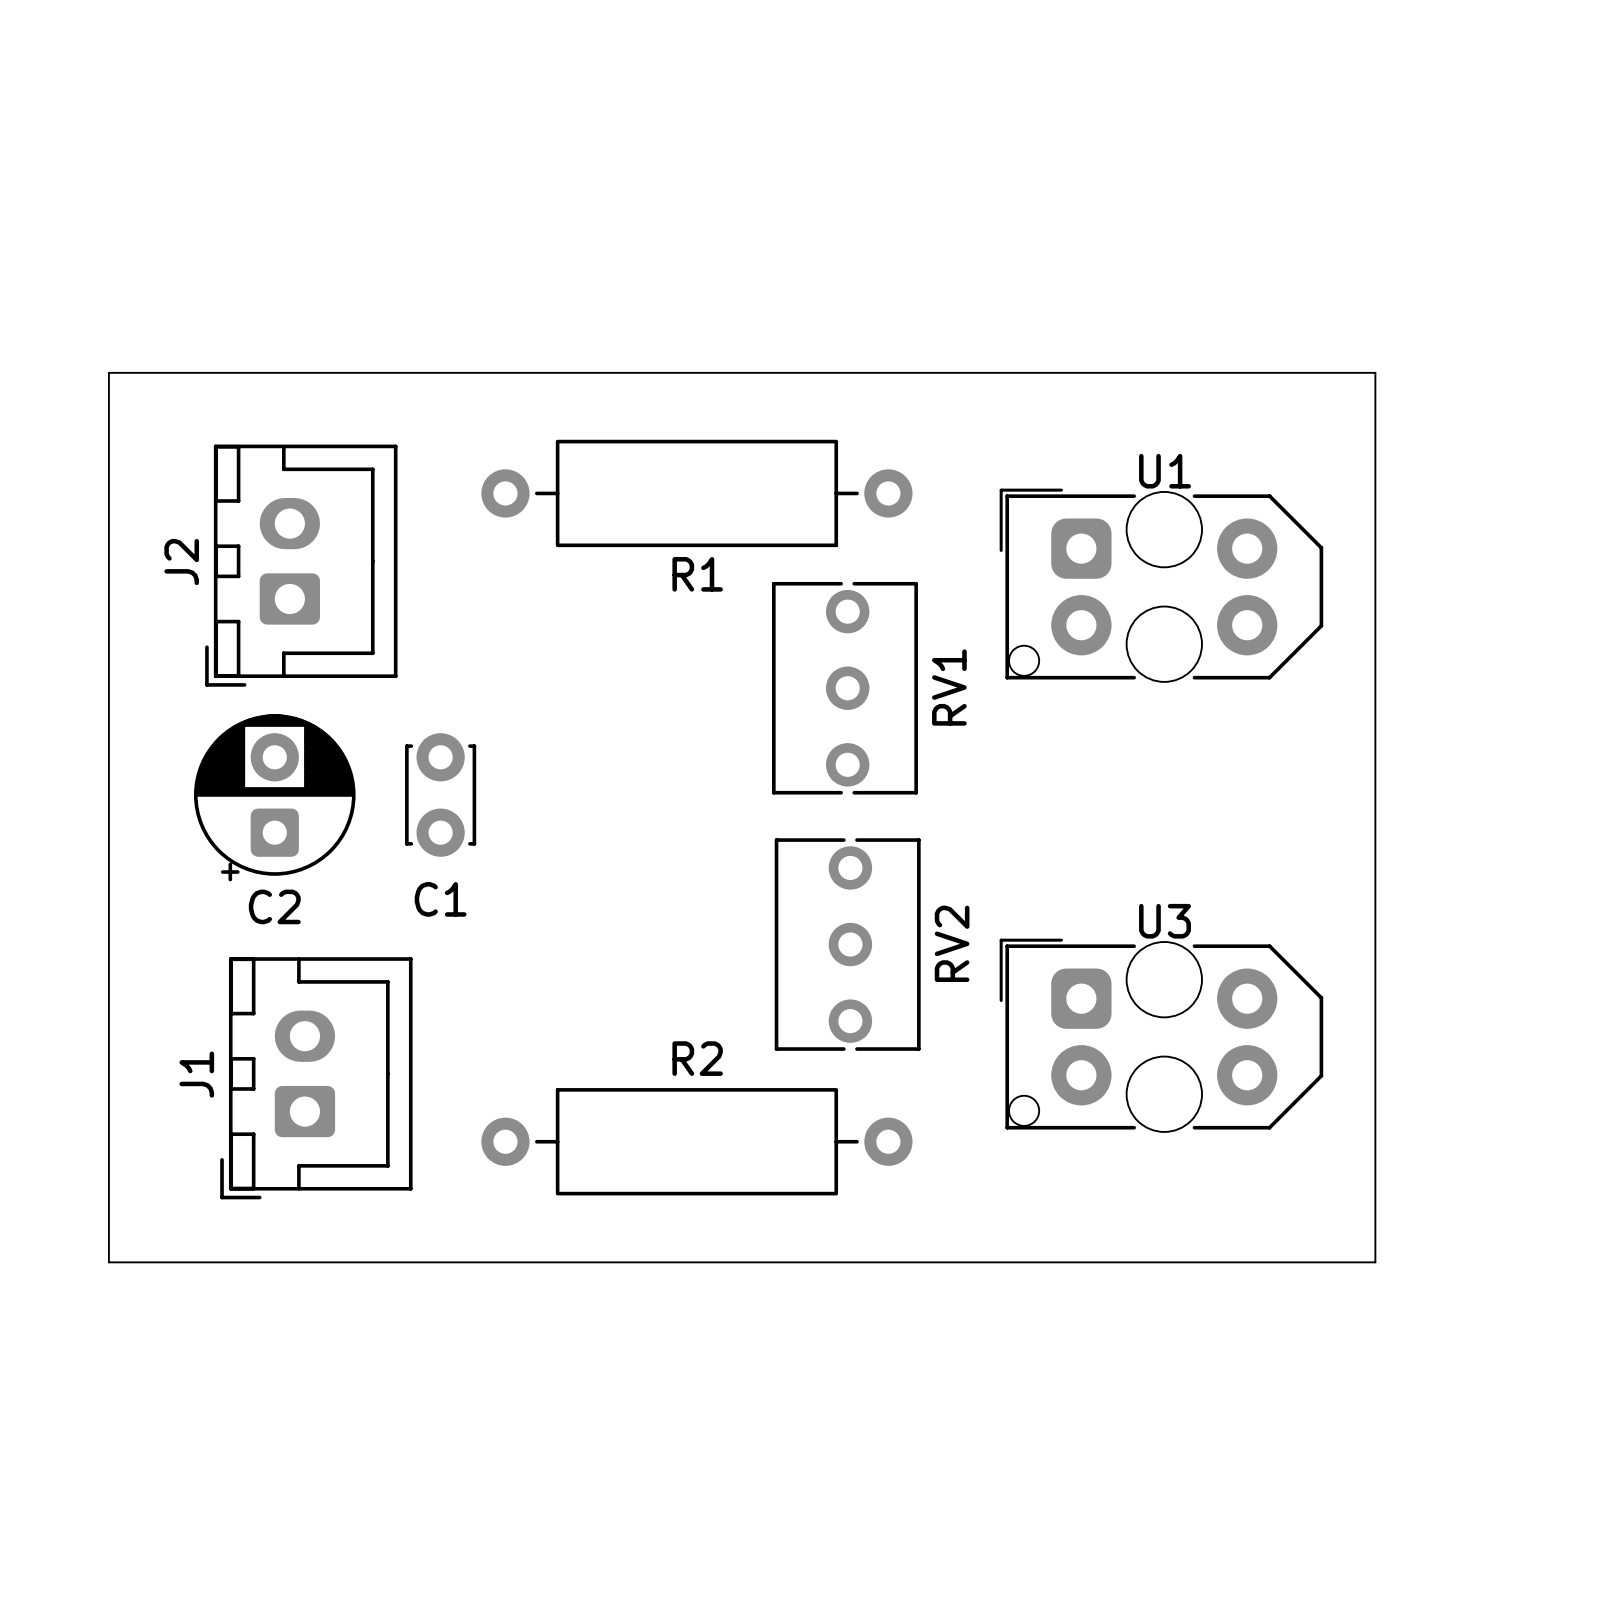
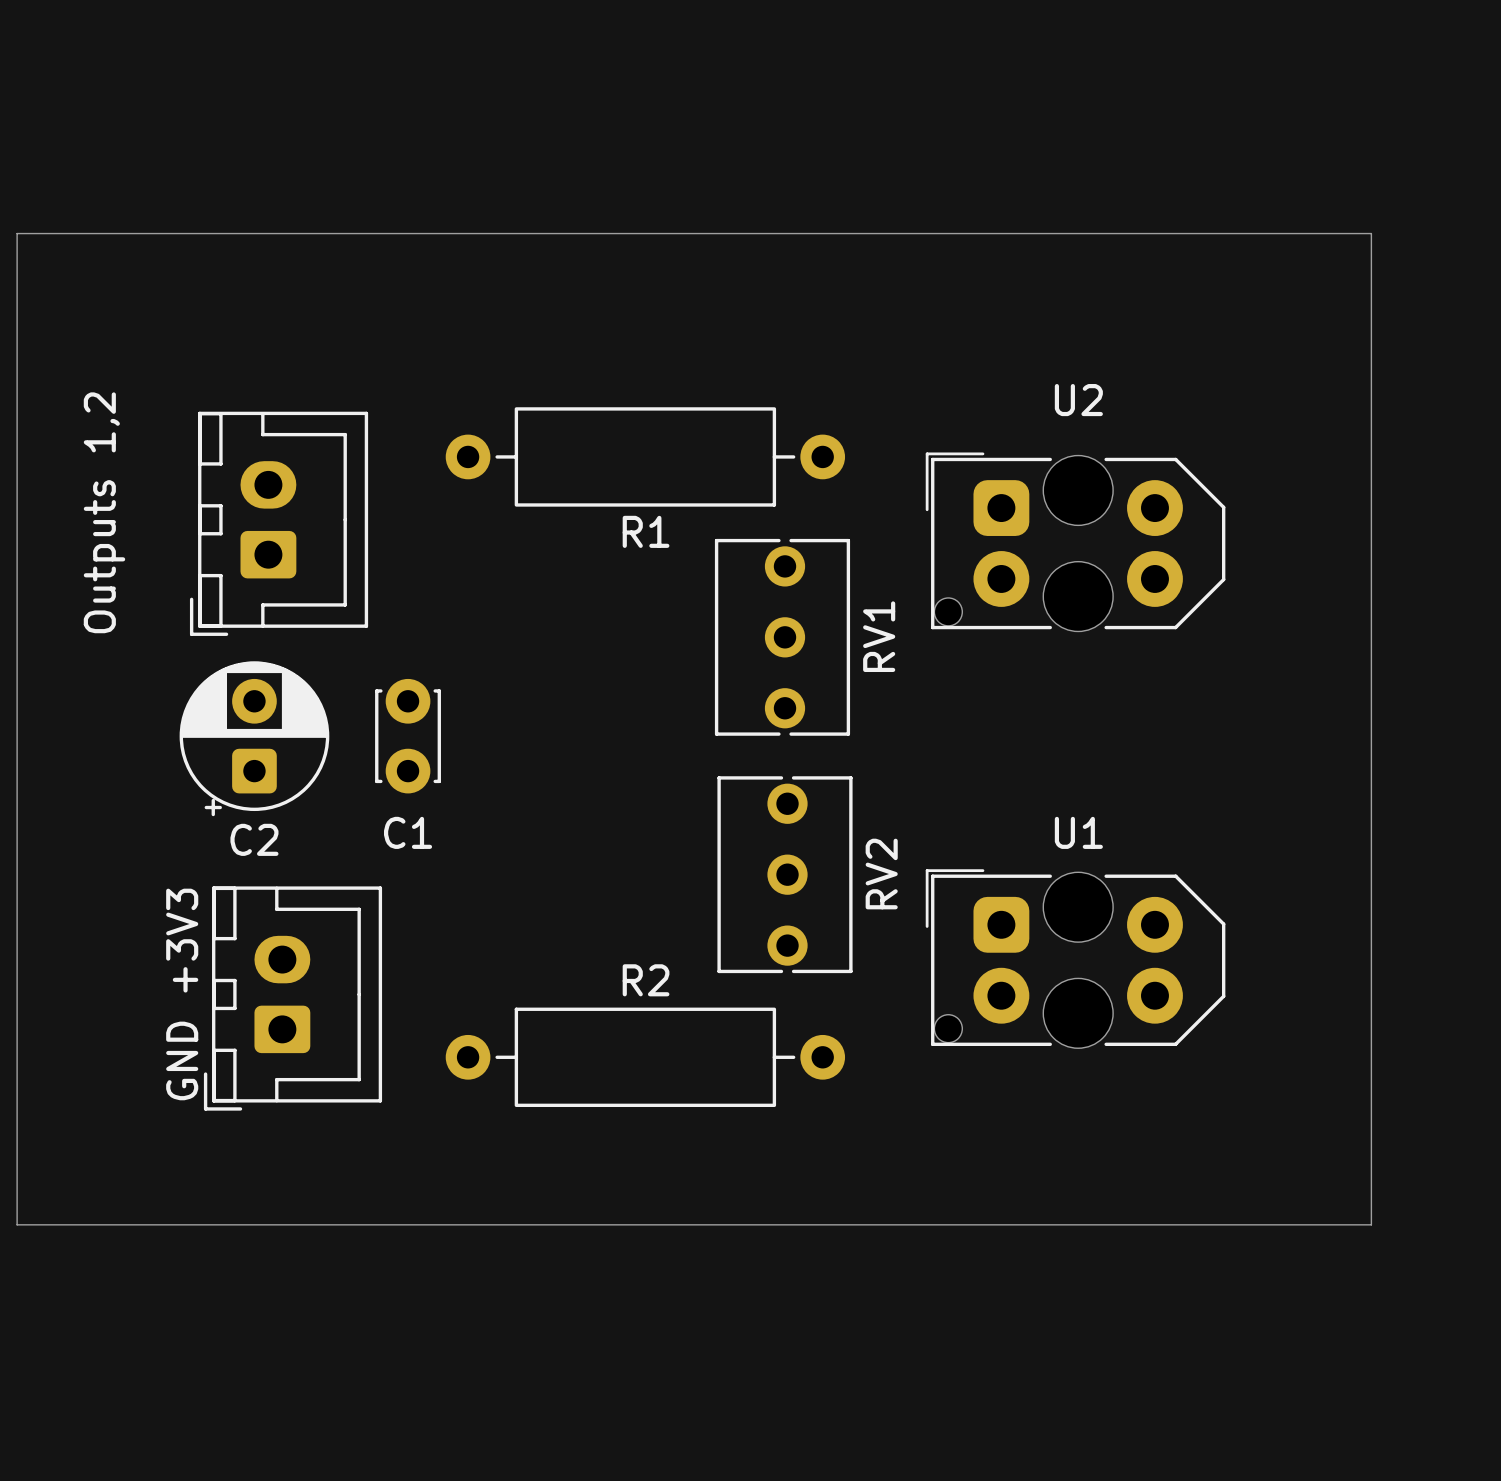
board edge: (108, 372) (1375, 372) (1375, 1262) (108, 1262) (108, 372) -> (17, 233) (17, 1224) (1371, 1224) (1371, 233) (17, 233)
U1 name: U1 (1165, 471) -> U2 (1078, 400)
J2 name: J2 (181, 562) -> Outputs 1,2 (104, 512)
U3 name: U3 (1165, 921) -> U1 (1078, 832)
J1 name: J1 (196, 1074) -> GND +3V3 (182, 994)

